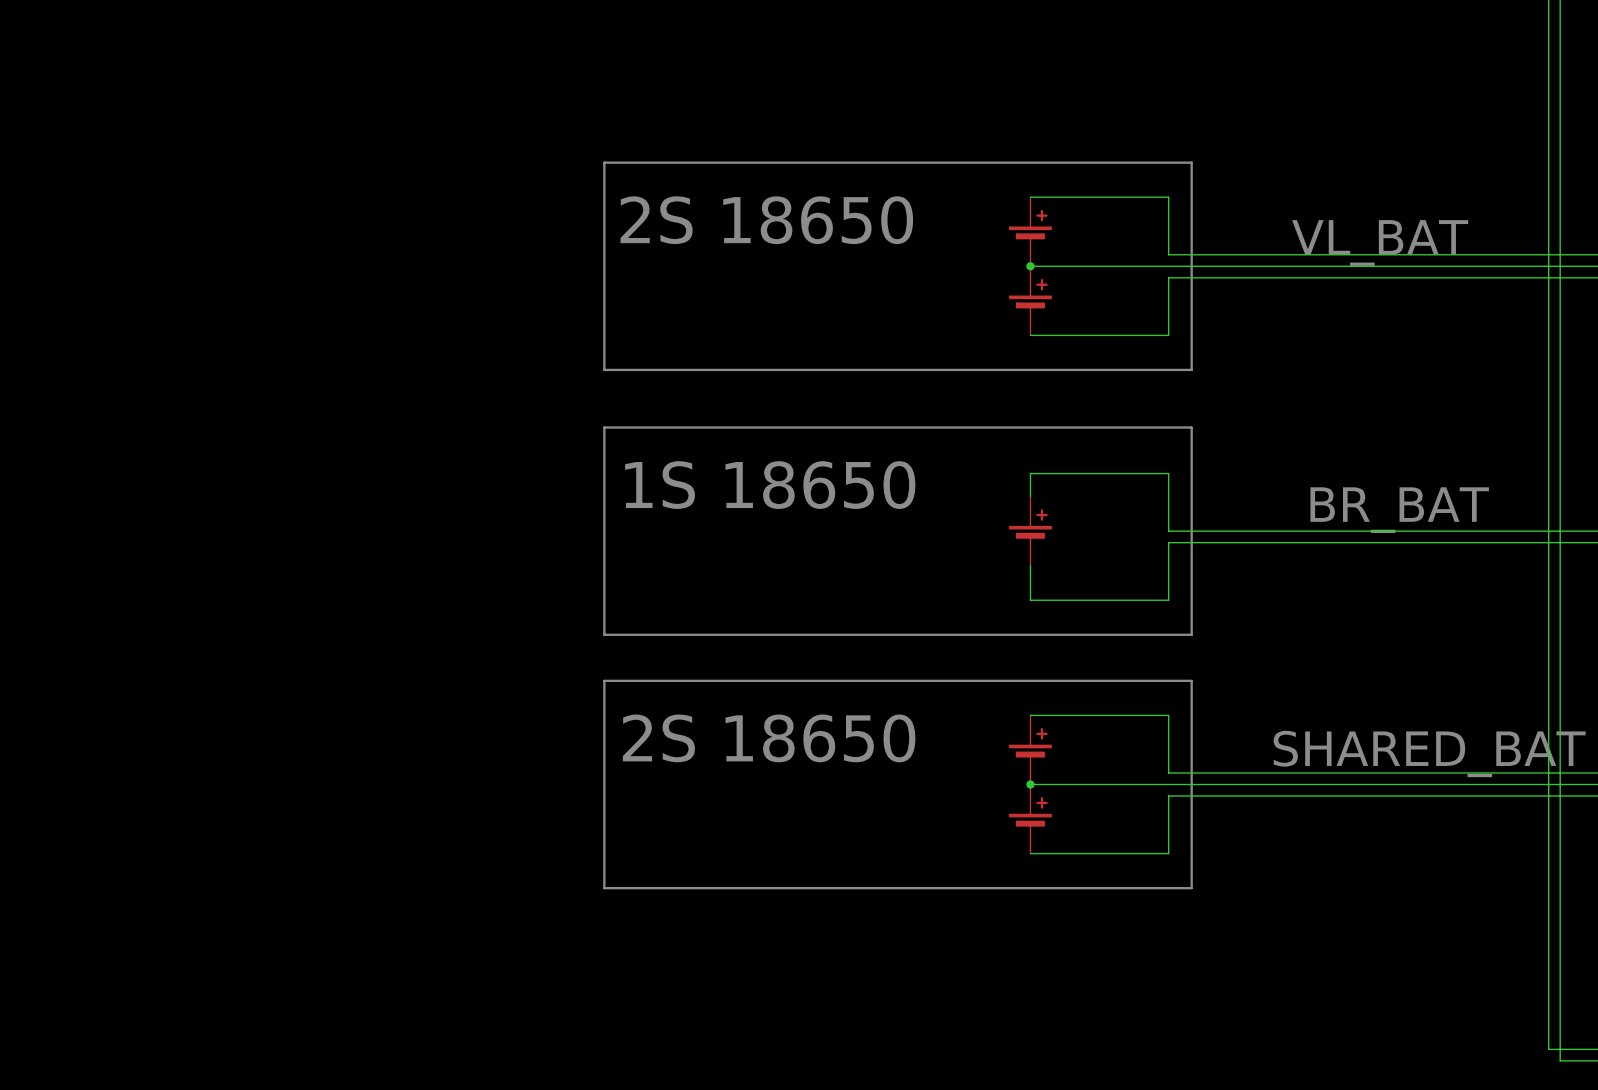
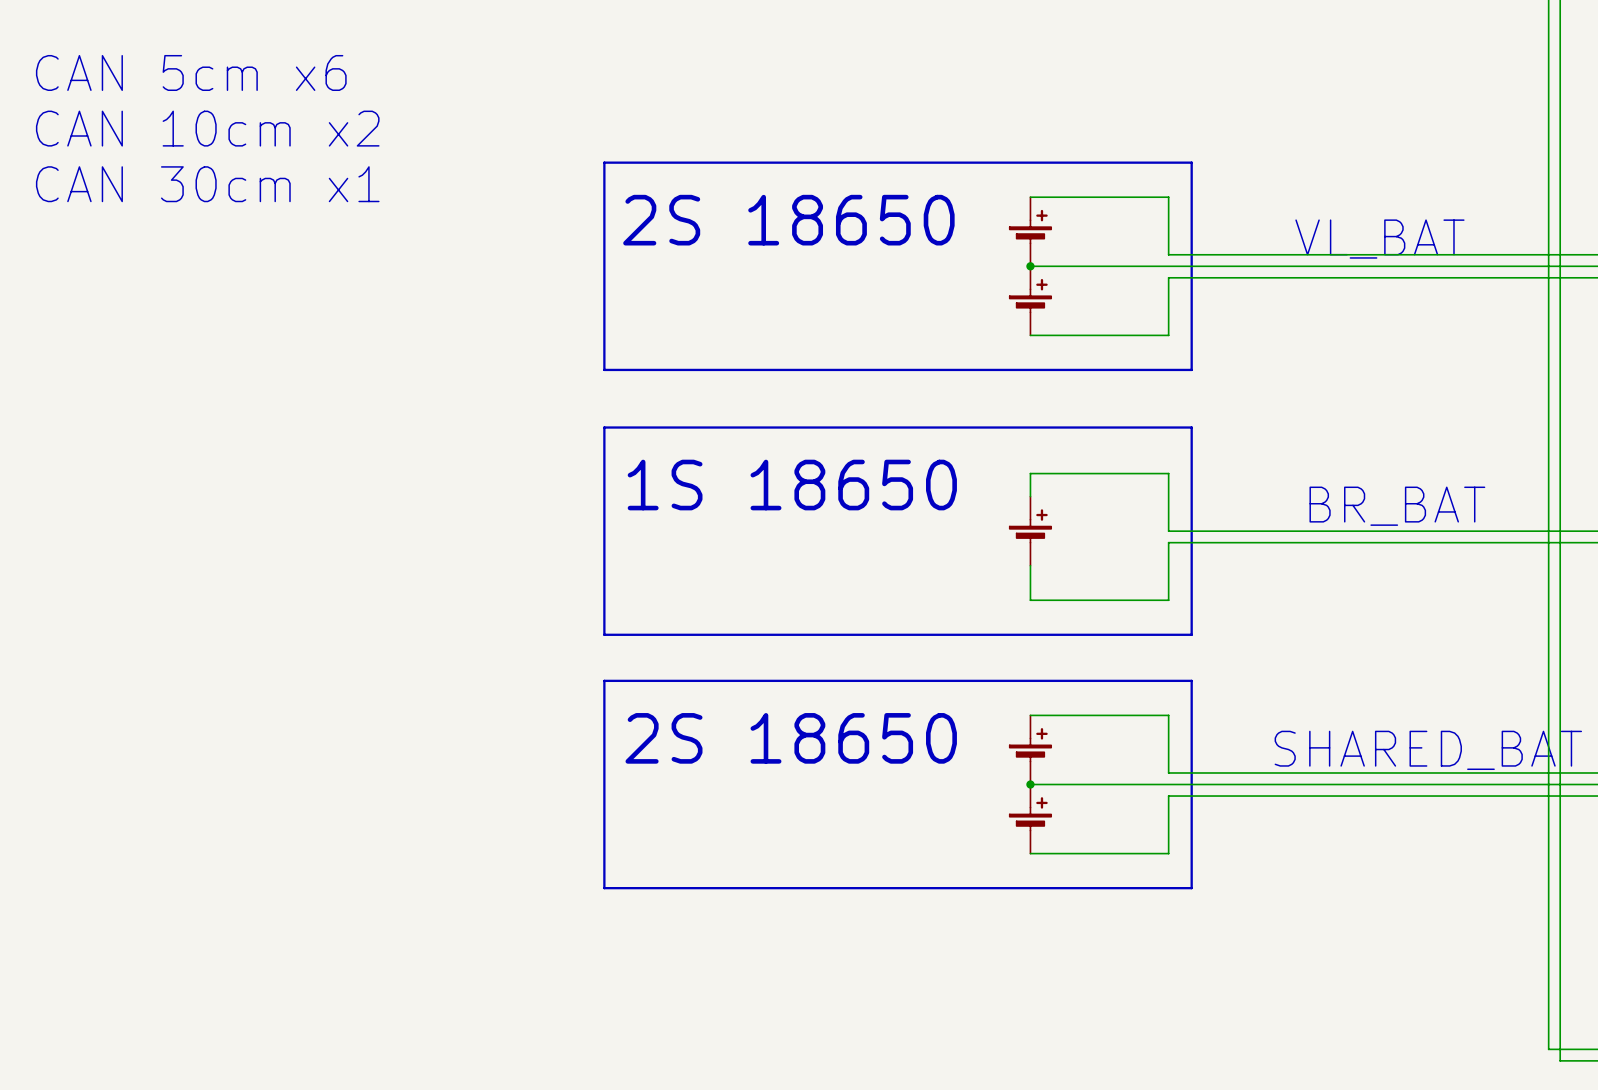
text: none -> CAN 5cm x6 (191, 72)
text: none -> CAN 10cm x2 (207, 128)
text: none -> CAN 30cm x1 (207, 184)

